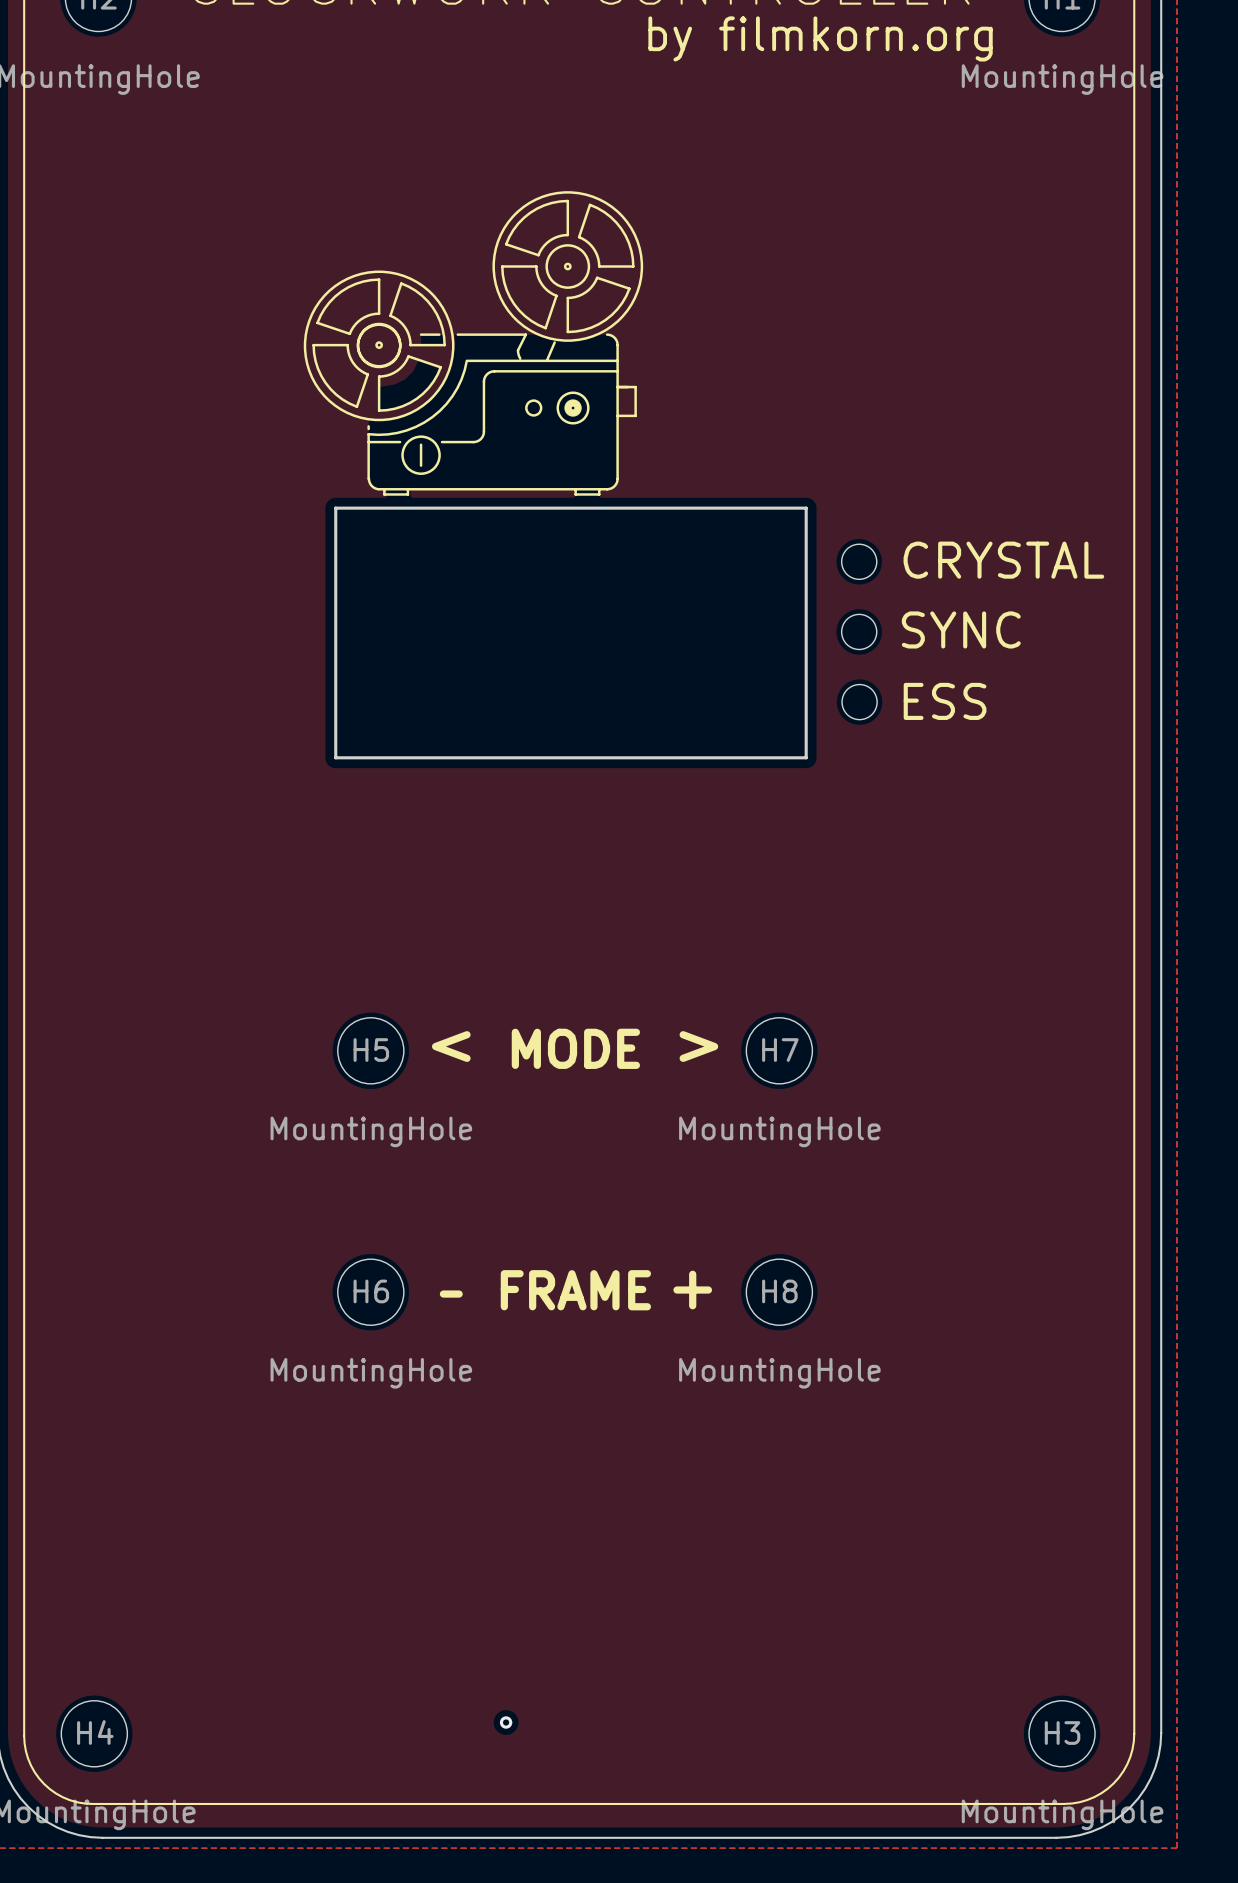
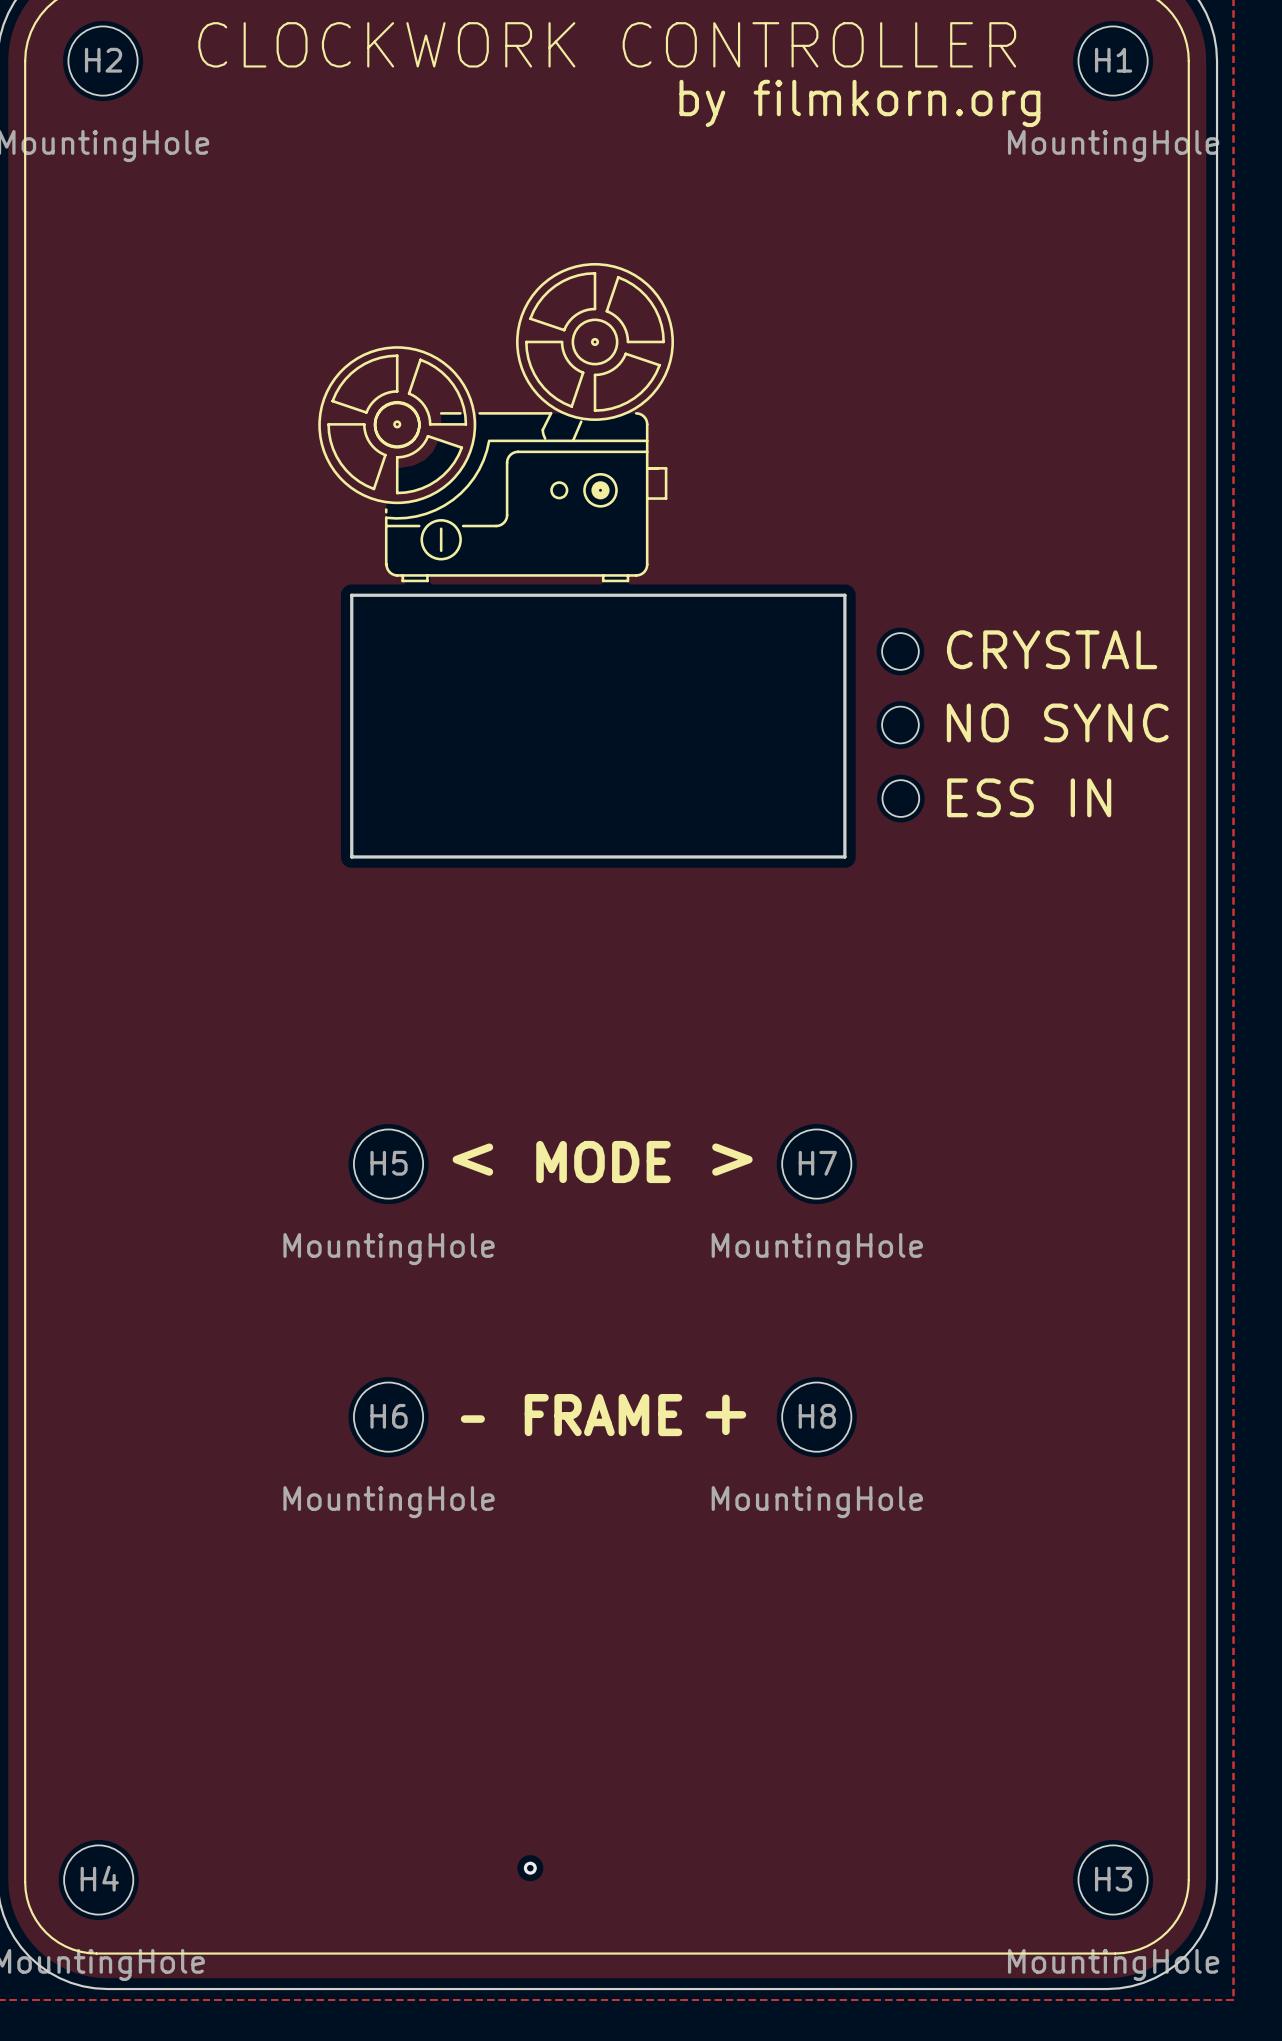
text: SYNC (961, 629) -> NO SYNC (1057, 722)
text: ESS (945, 701) -> ESS IN (1029, 797)

